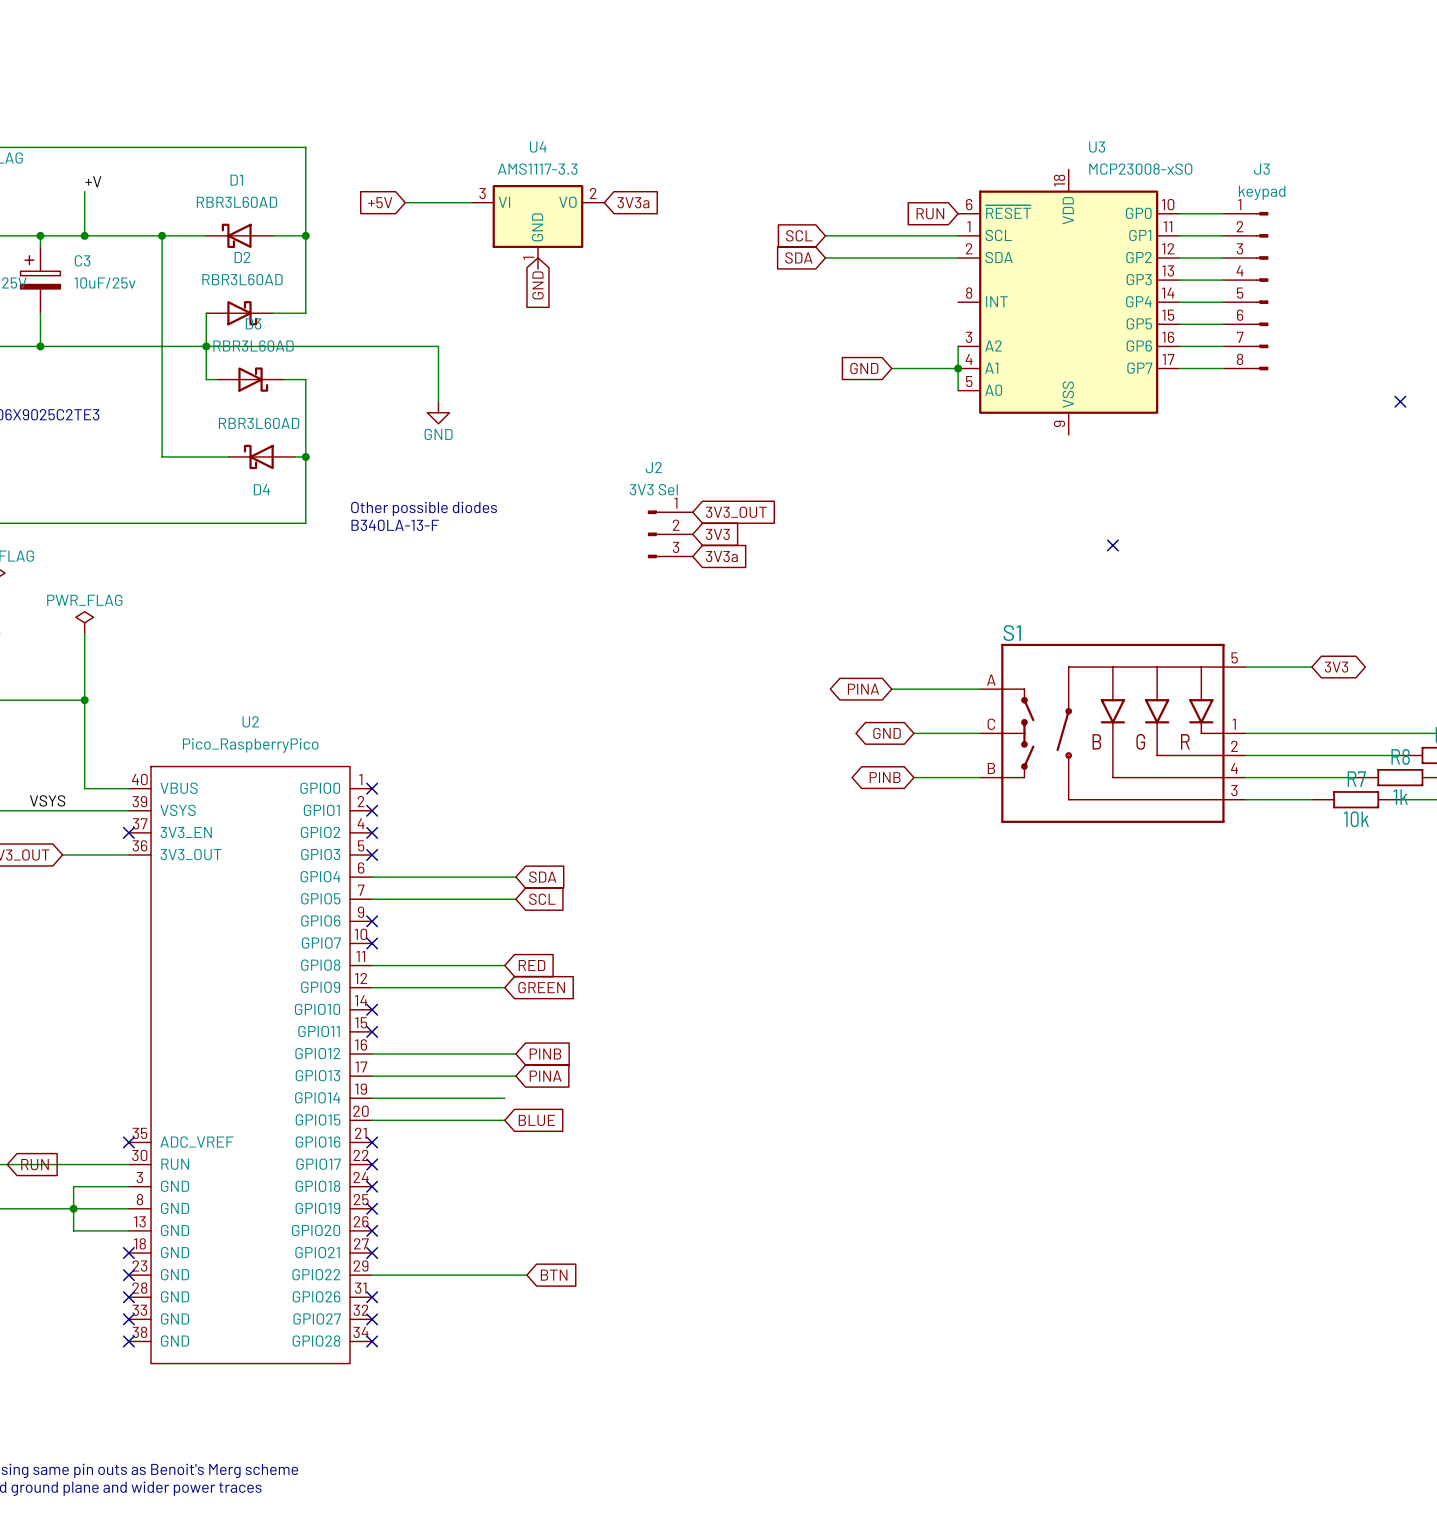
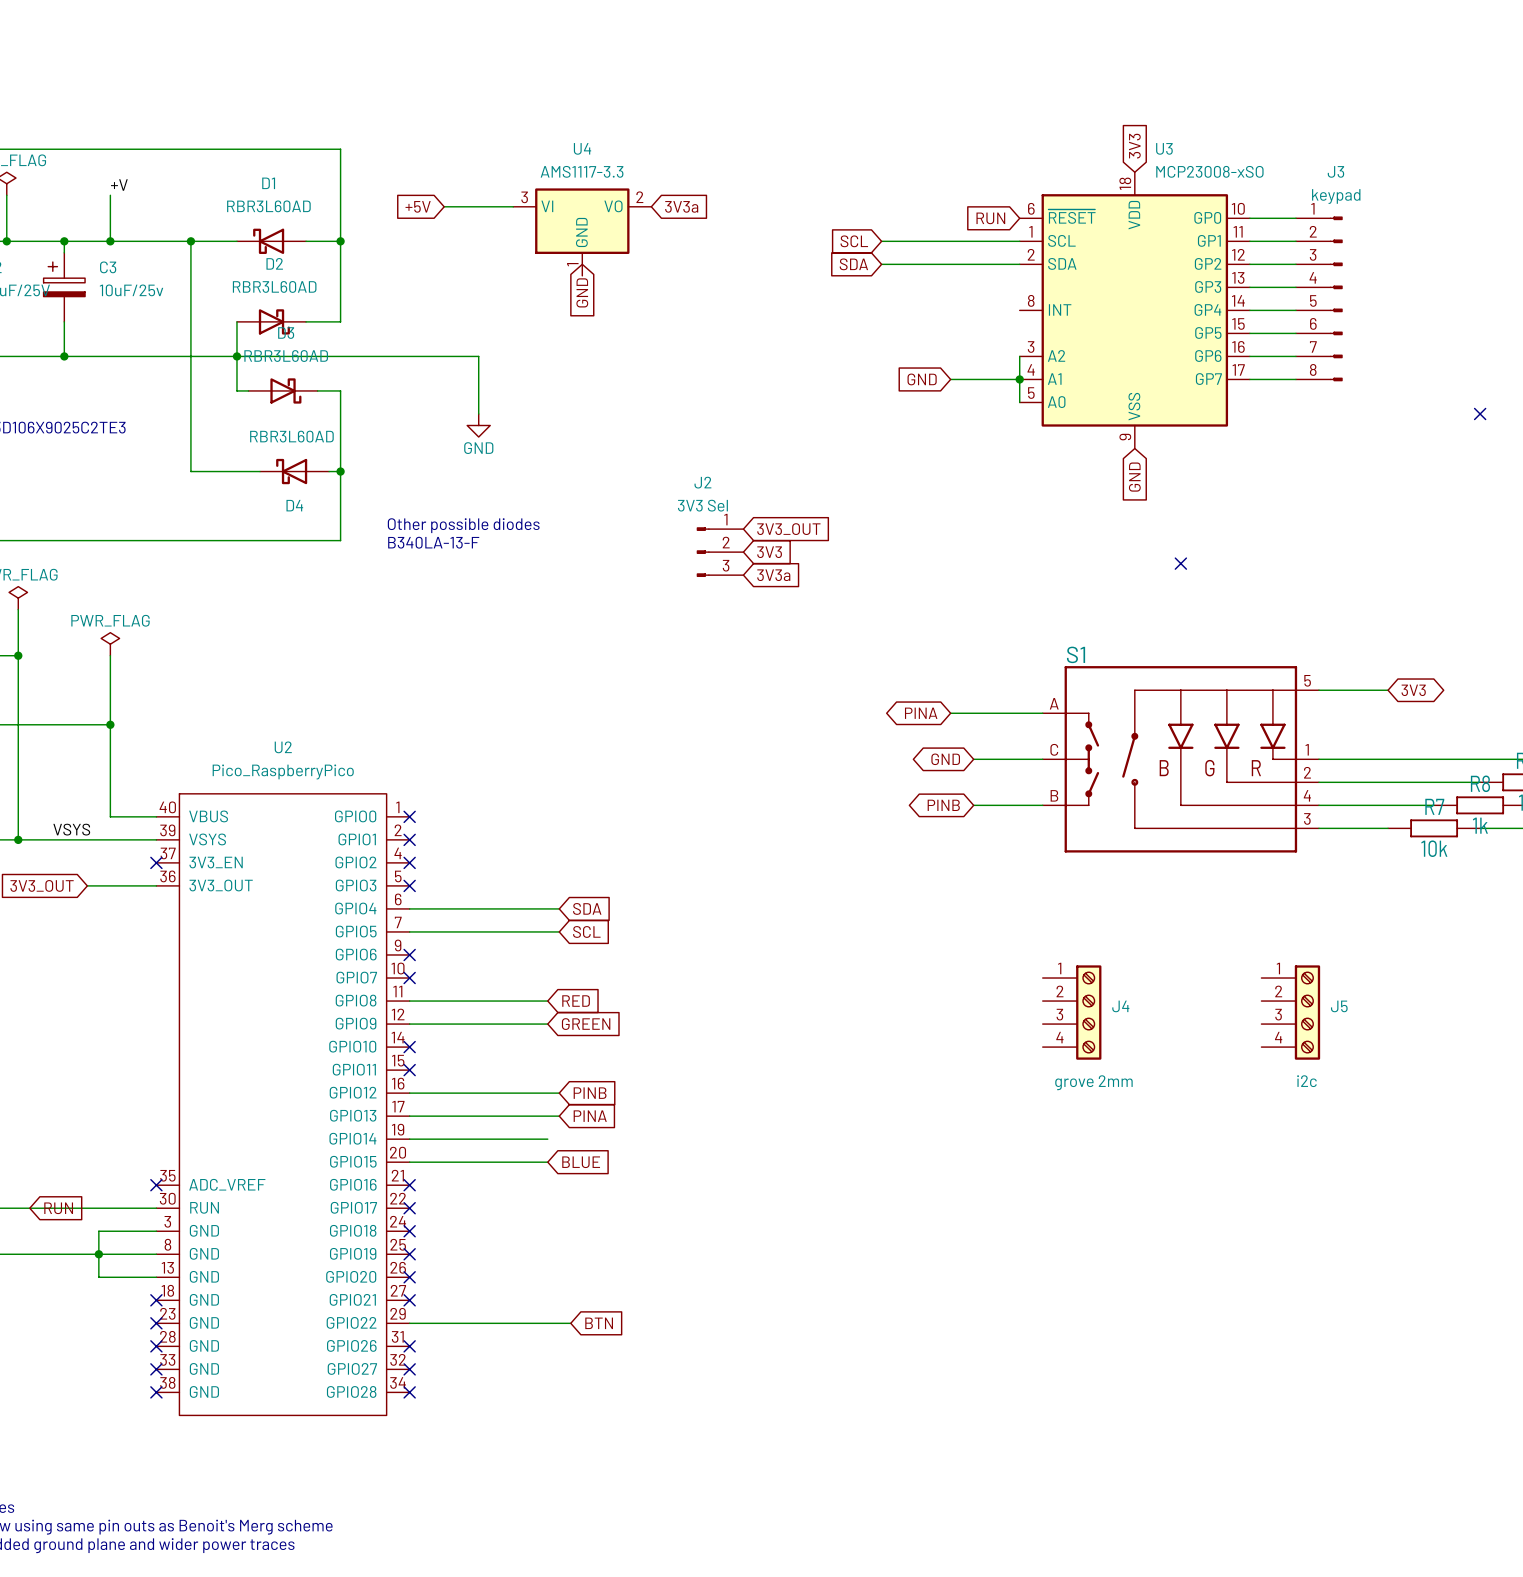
global label: none -> 3V3 (1134, 146)
global label: none -> GND (1134, 477)
J4: none -> grove 2mm (1072, 1012)
J5: none -> i2c (1290, 1012)

